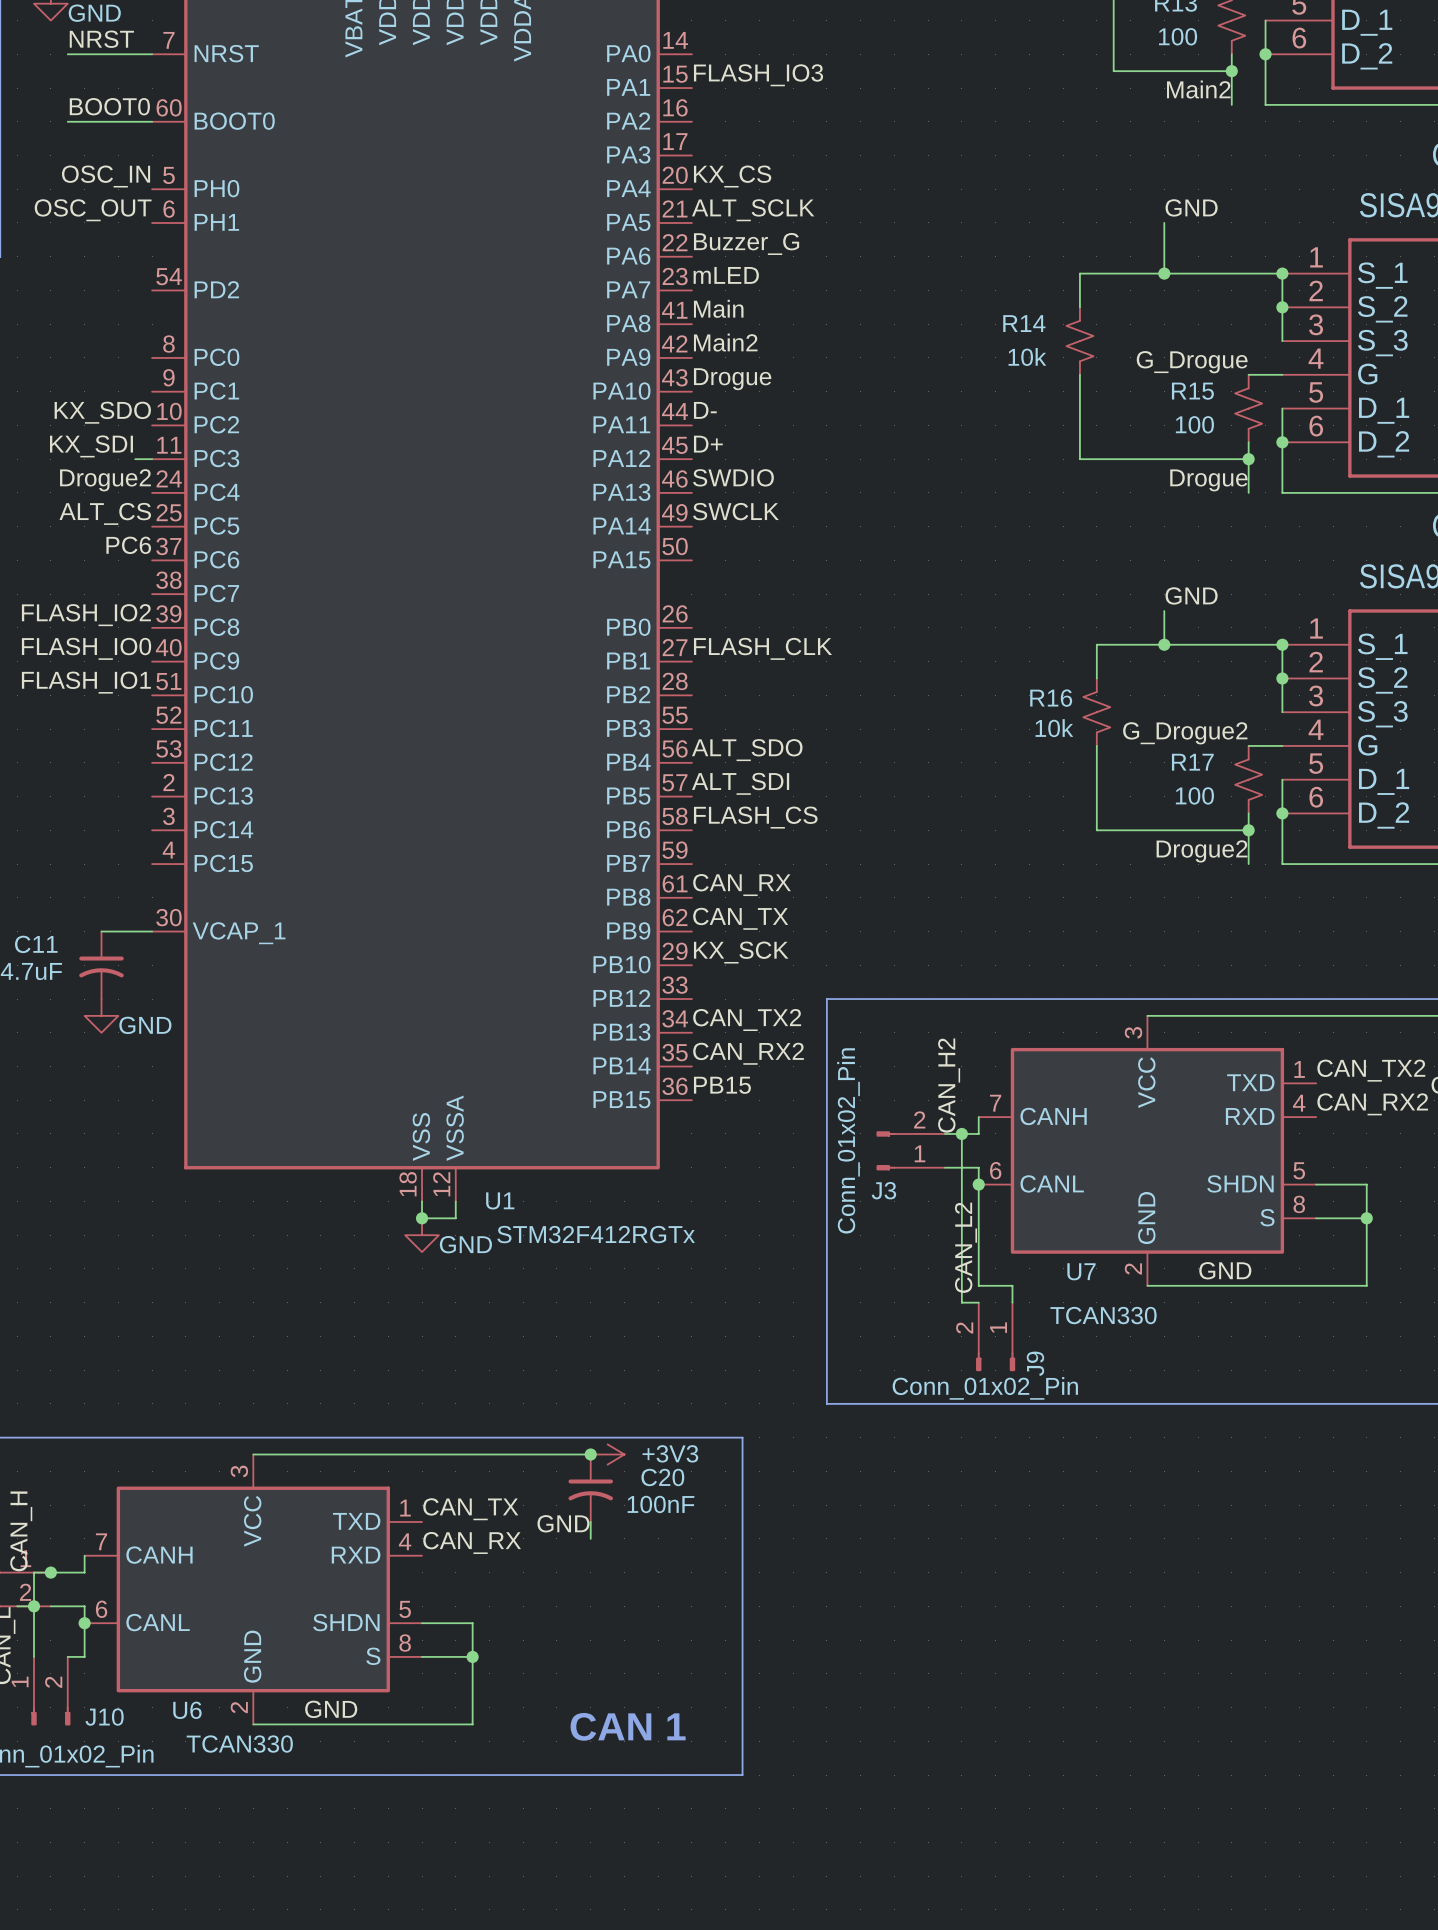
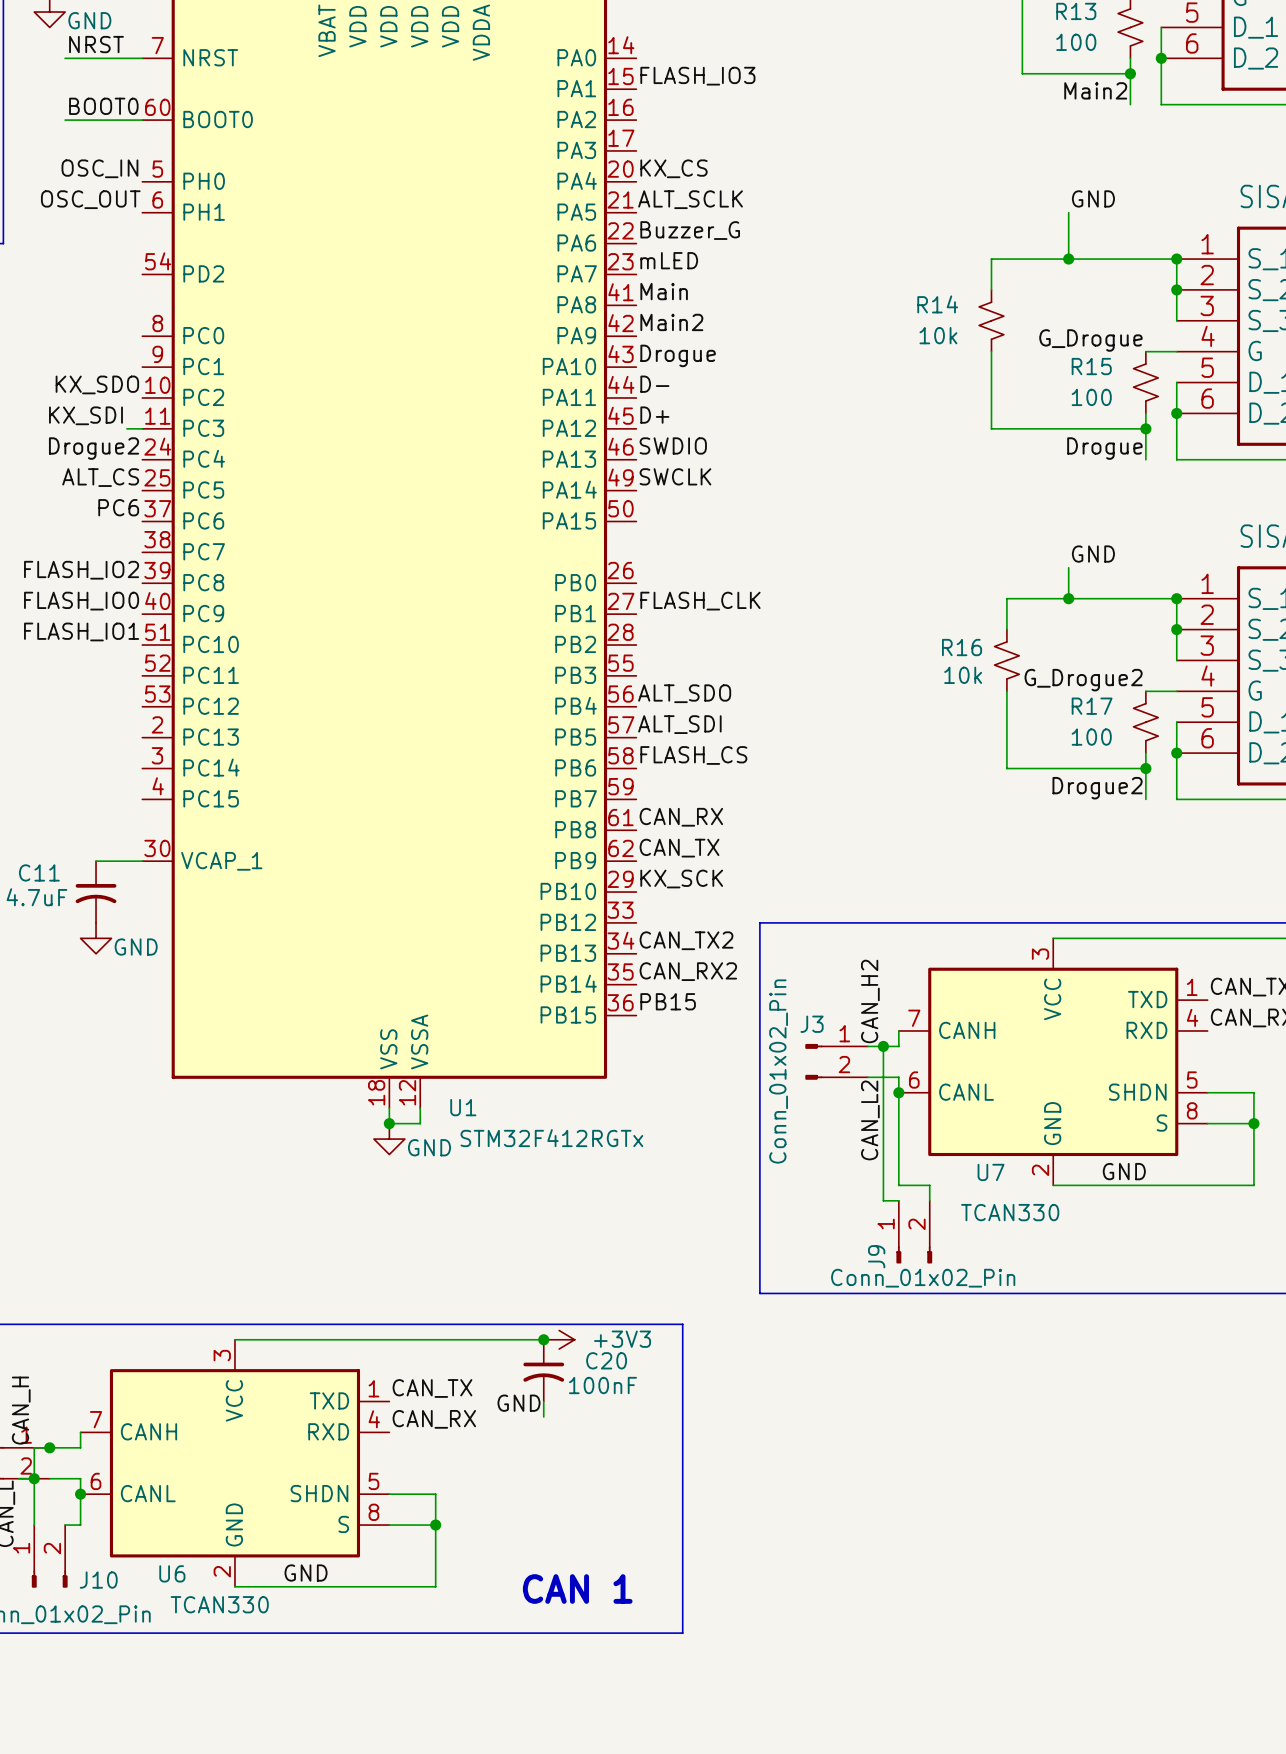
J3 flip: as is (885, 1150) -> up-down (813, 1061)
label position: CAN_L2 (965, 1247) -> CAN_L2 (870, 1120)
J9 flip: as is (995, 1361) -> left-right (914, 1254)

